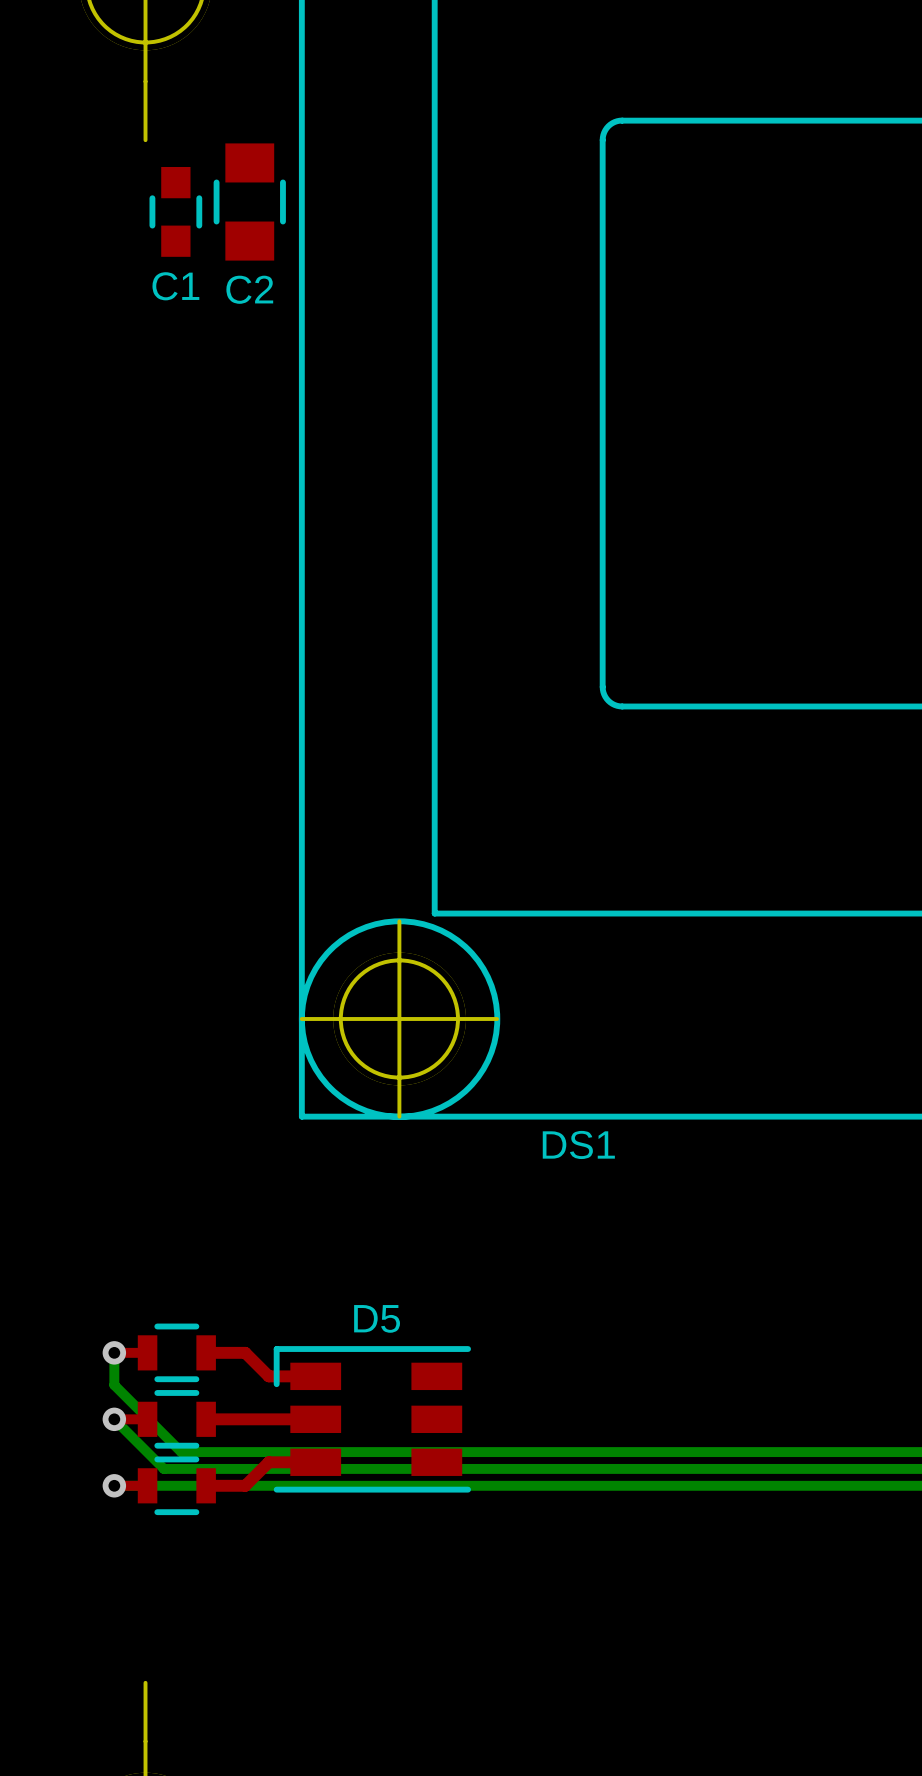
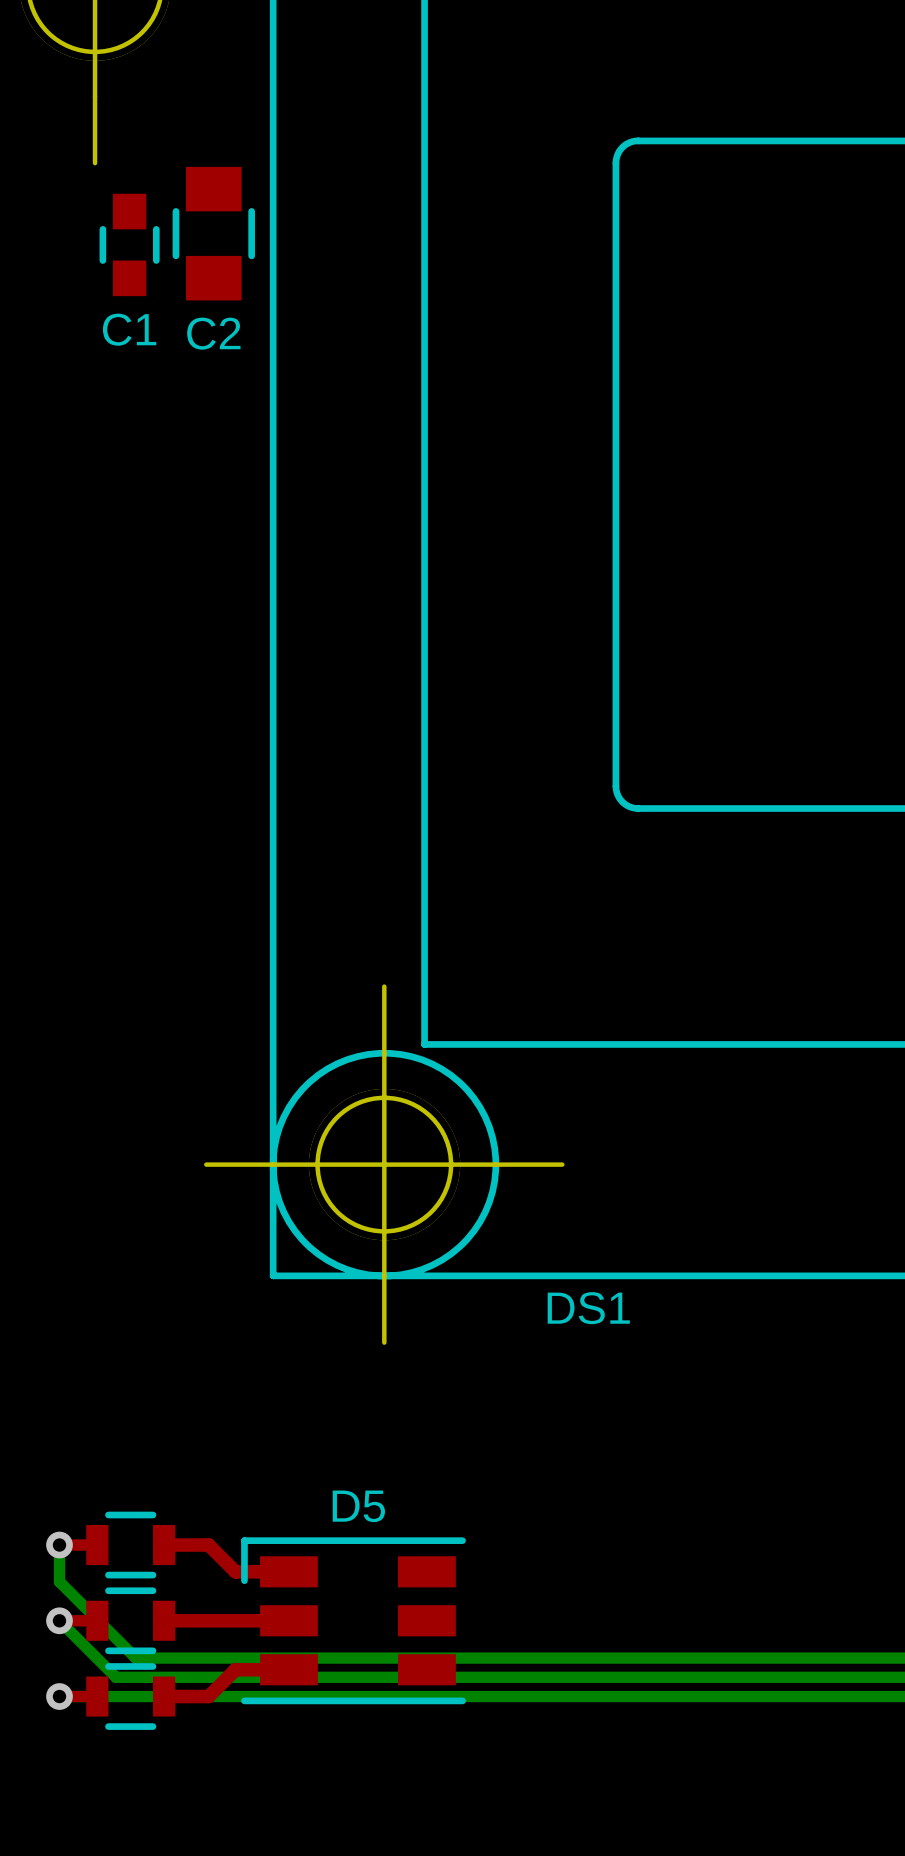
board edge: none -> (384, 986) (384, 1053)
board edge: none -> (206, 1164) (273, 1164)
board edge: none -> (495, 1164) (562, 1164)
board edge: none -> (384, 1275) (384, 1342)

